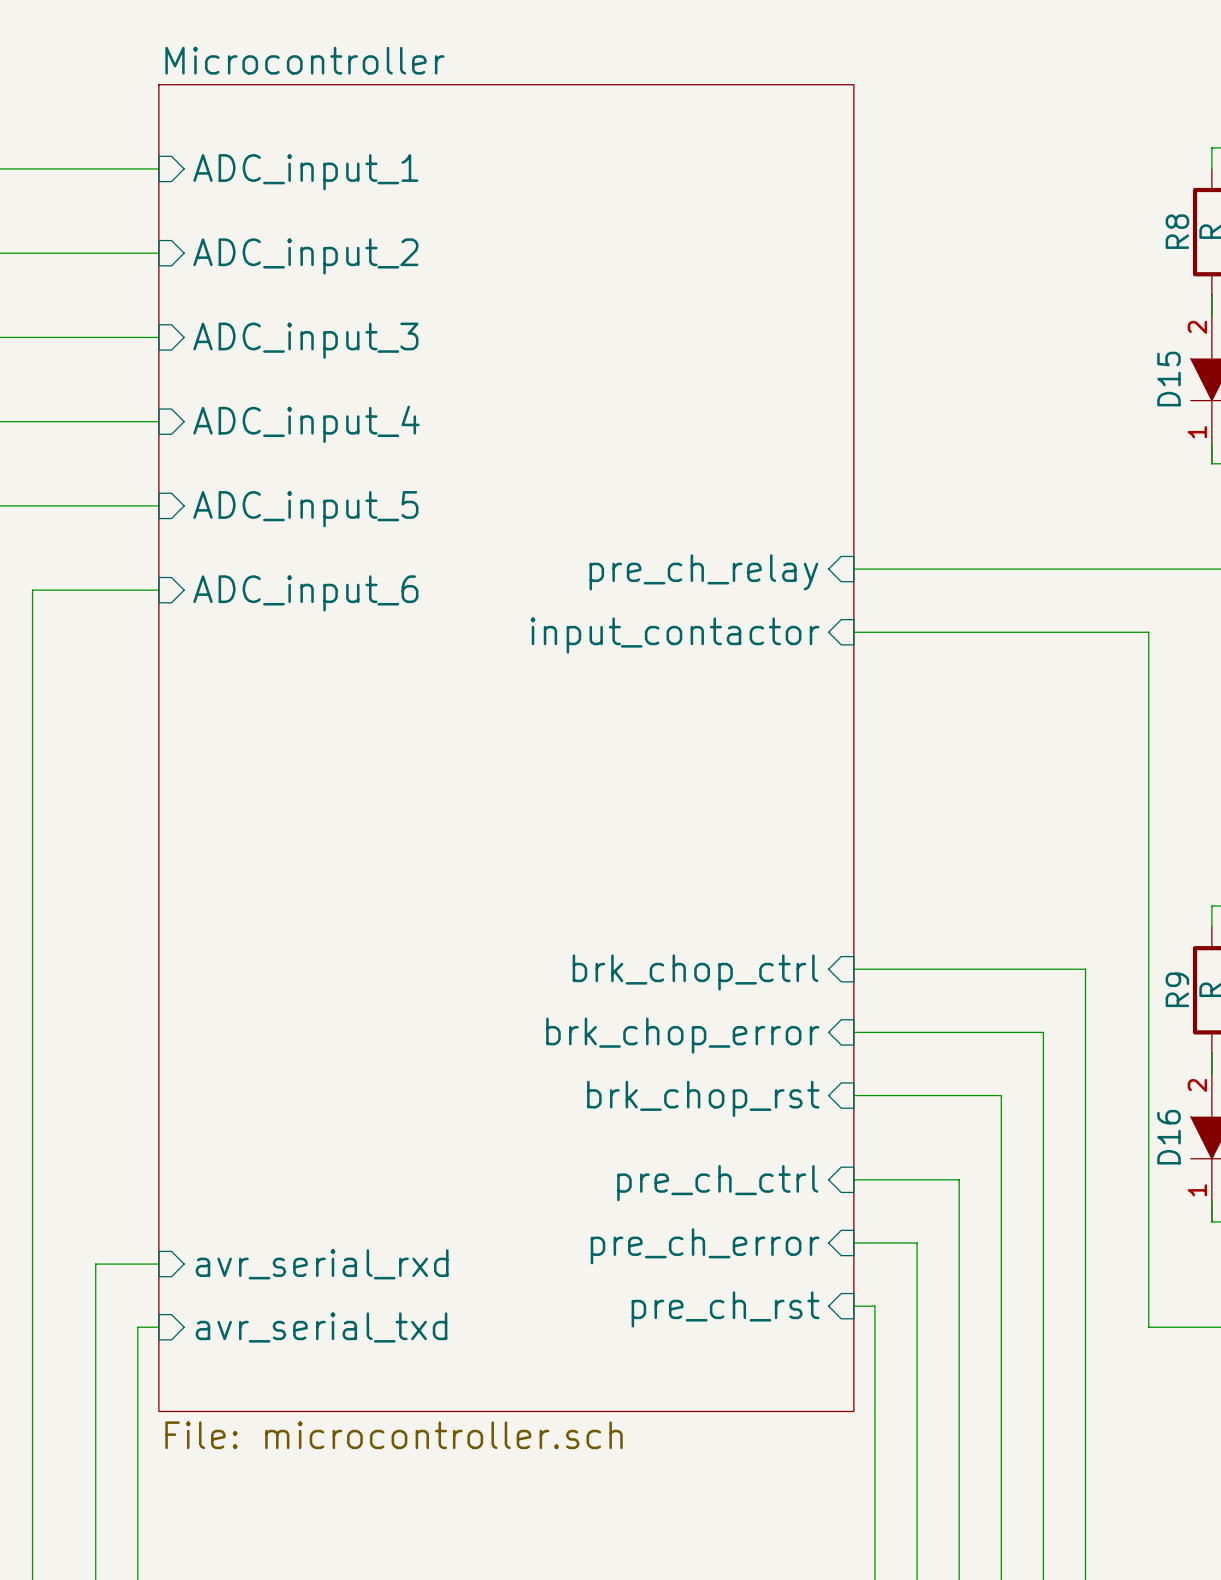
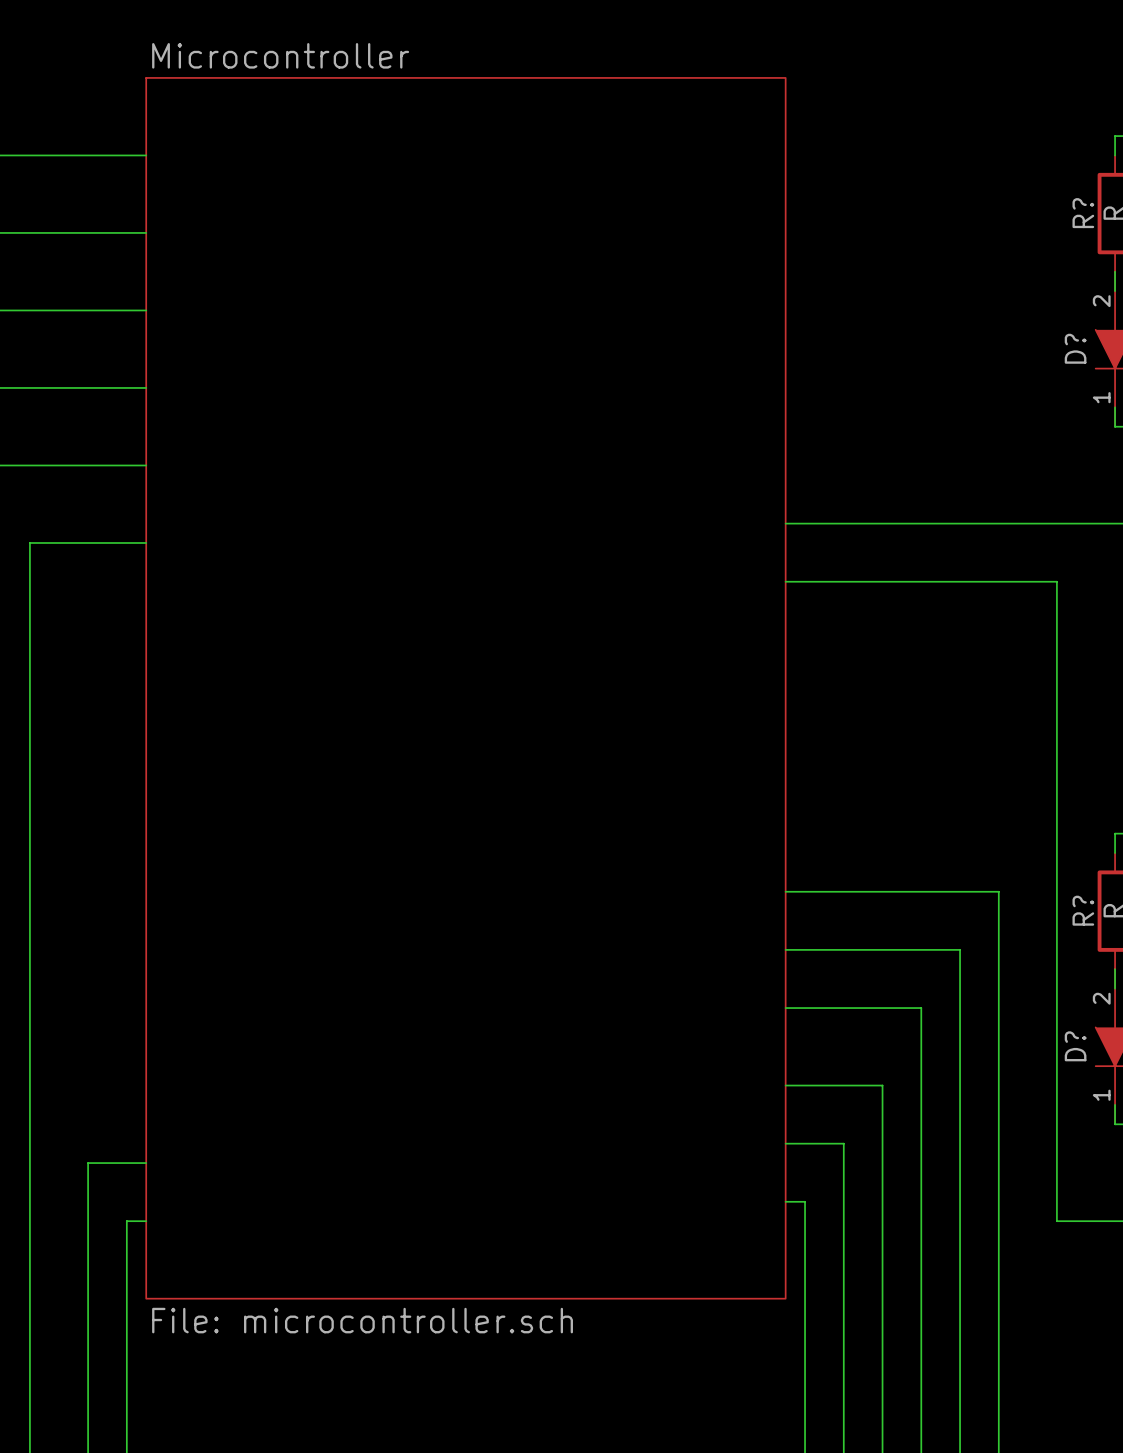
sheet pin: ADC_input_1 (305, 172) -> none
R8 name: R8 (1177, 231) -> R? (1083, 213)
sheet pin: ADC_input_2 (305, 256) -> none
sheet pin: ADC_input_3 (305, 340) -> none
D15 name: D15 (1168, 379) -> D? (1075, 348)
sheet pin: ADC_input_4 (306, 424) -> none
sheet pin: ADC_input_5 (305, 509) -> none
sheet pin: pre_ch_relay (703, 572) -> none
sheet pin: ADC_input_6 (305, 593) -> none
sheet pin: input_contactor (675, 635) -> none
sheet pin: brk_chop_ctrl (695, 972) -> none
R9 name: R9 (1177, 989) -> R? (1083, 910)
sheet pin: brk_chop_error (682, 1035) -> none
sheet pin: brk_chop_rst (703, 1098) -> none
D16 name: D16 (1168, 1137) -> D? (1075, 1046)
sheet pin: pre_ch_ctrl (717, 1183) -> none
sheet pin: pre_ch_error (705, 1246) -> none
sheet pin: avr_serial_rxd (322, 1264) -> none
sheet pin: pre_ch_rst (725, 1309) -> none
sheet pin: avr_serial_txd (321, 1327) -> none

